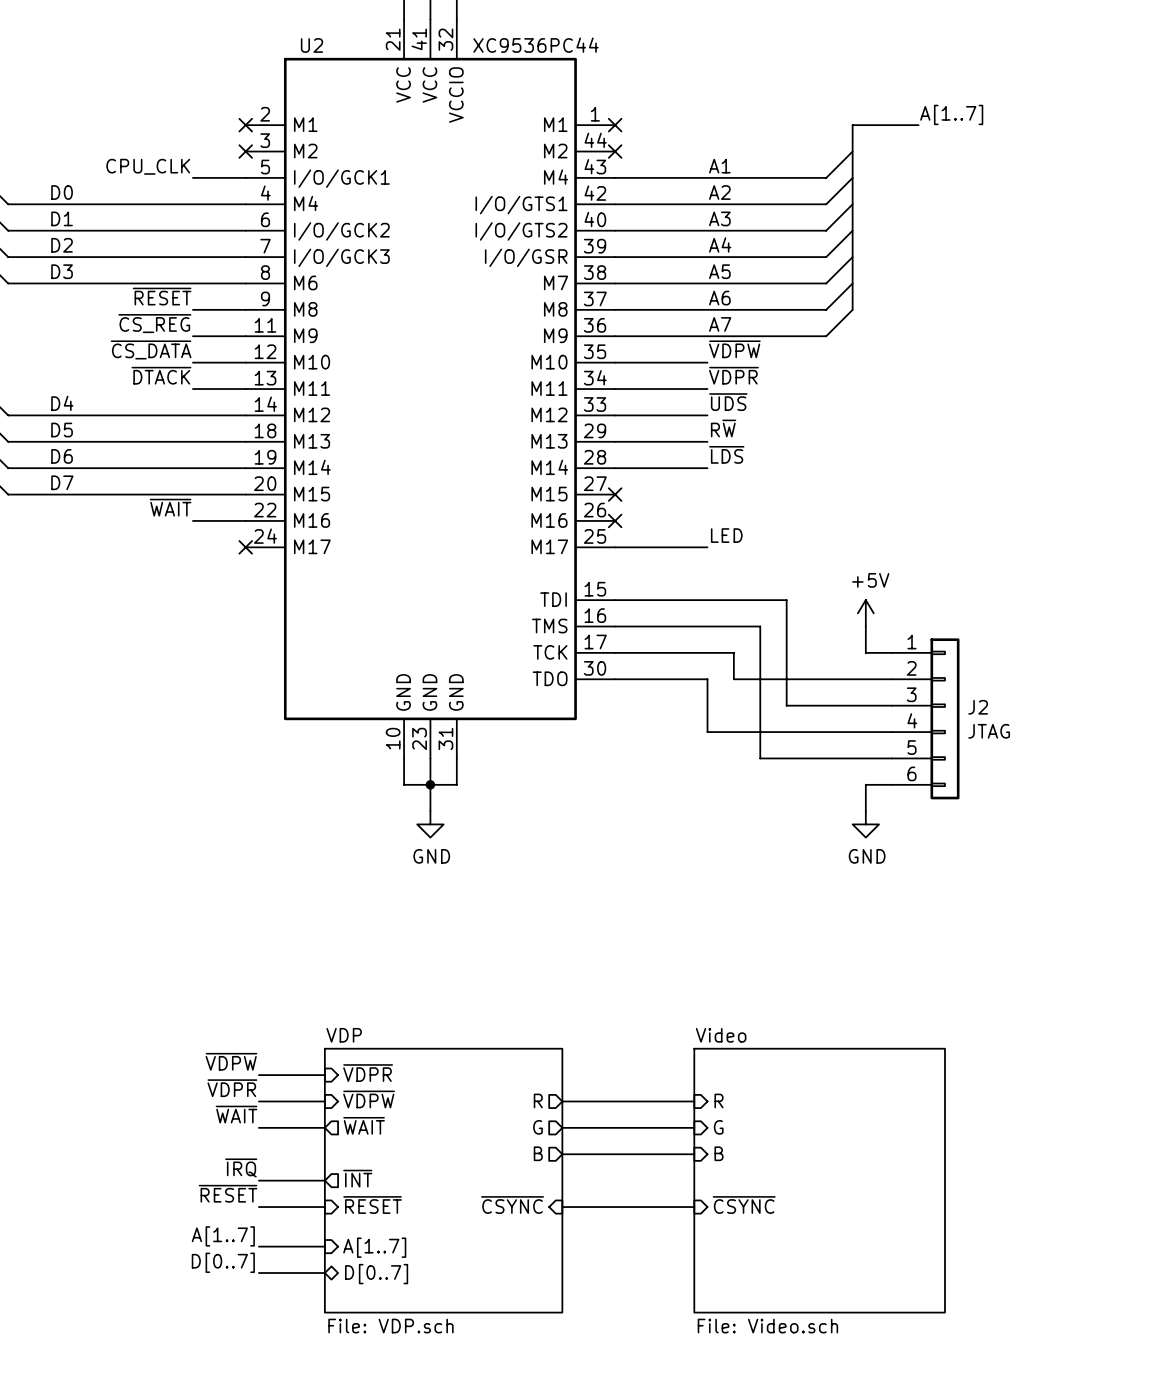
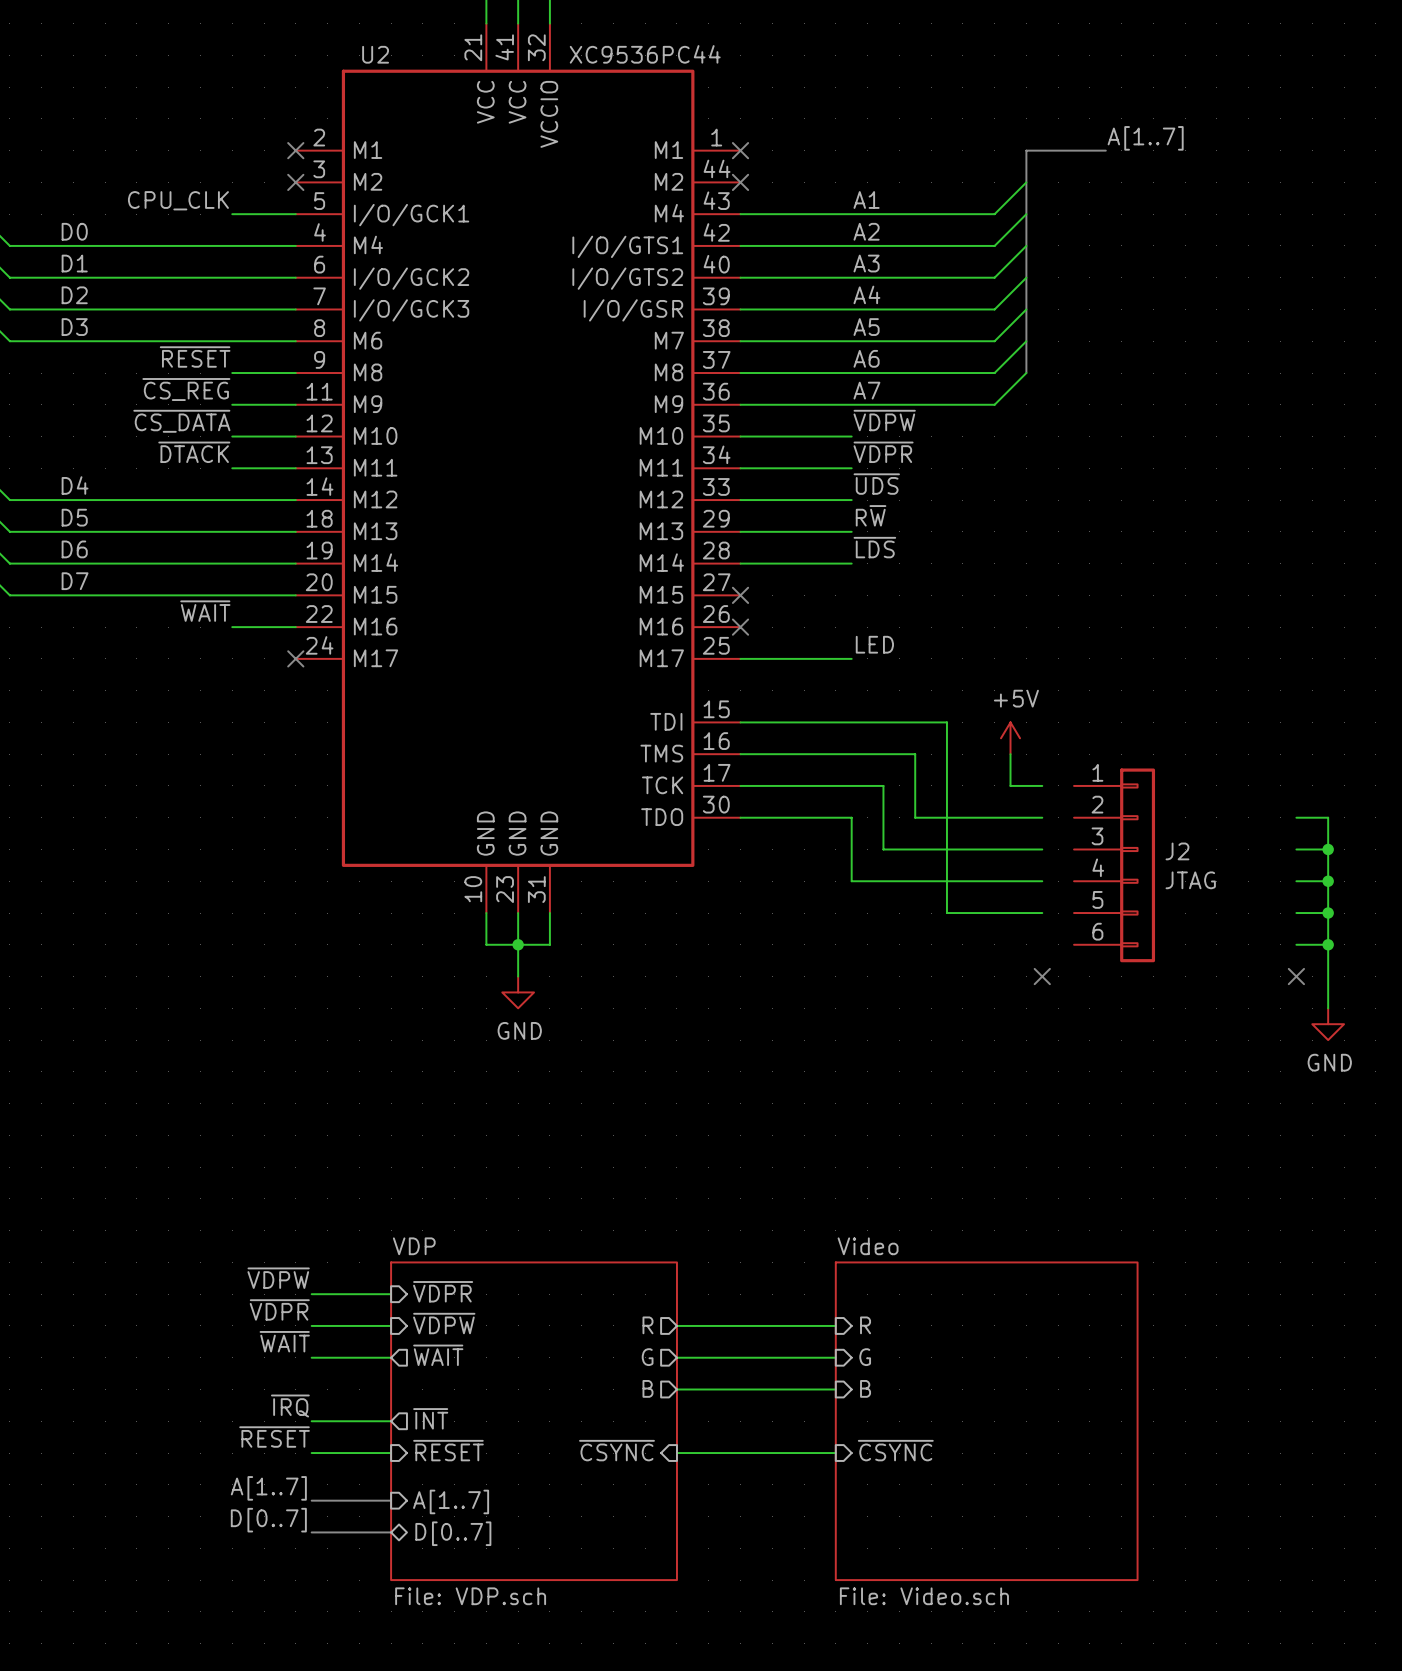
power symbol position: +5V (865, 613) -> +5V (1010, 738)
wire: (865, 626) (865, 652) (892, 652) -> (1010, 754) (1010, 785) (1042, 785)
wire: (733, 679) (760, 679) (760, 758) (786, 758) -> (883, 817) (883, 849) (946, 849) (946, 913)
wire: (865, 679) (892, 679) -> (1296, 849) (1328, 849)
wire: none -> (1296, 817) (1328, 817) (1328, 1008)
wire: (865, 705) (892, 705) -> (1296, 881) (1328, 881)
junction: none -> (1328, 849)
wire: (865, 732) (892, 732) -> (1296, 913) (1328, 913)
junction: none -> (1328, 881)
wire: (865, 758) (892, 758) -> (1296, 944) (1328, 944)
junction: none -> (1328, 913)
wire: (892, 784) (865, 784) (865, 811) -> none
junction: none -> (1328, 944)
no-connect mark: none -> (1042, 976)
no-connect mark: none -> (1296, 976)
power symbol position: GND (865, 824) -> GND (1328, 1024)

